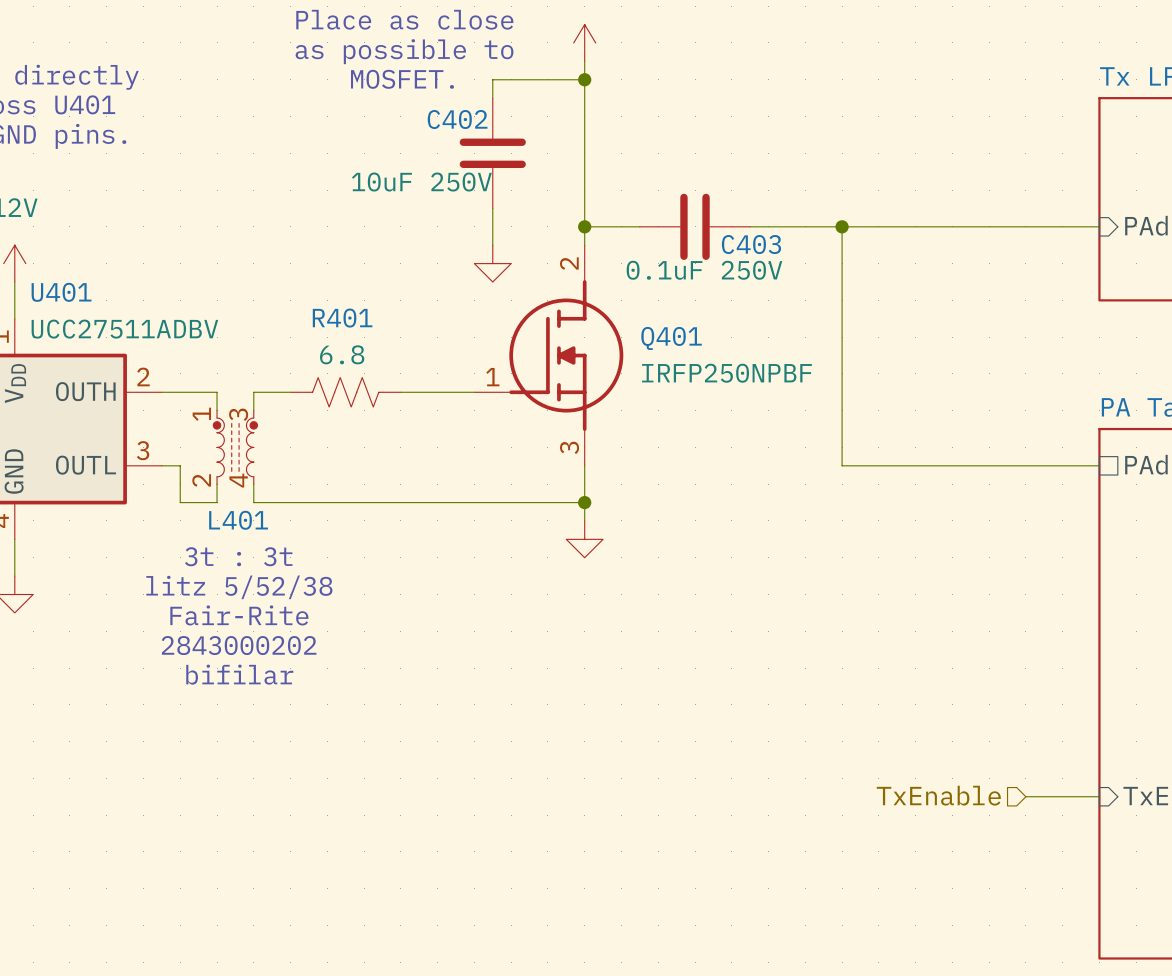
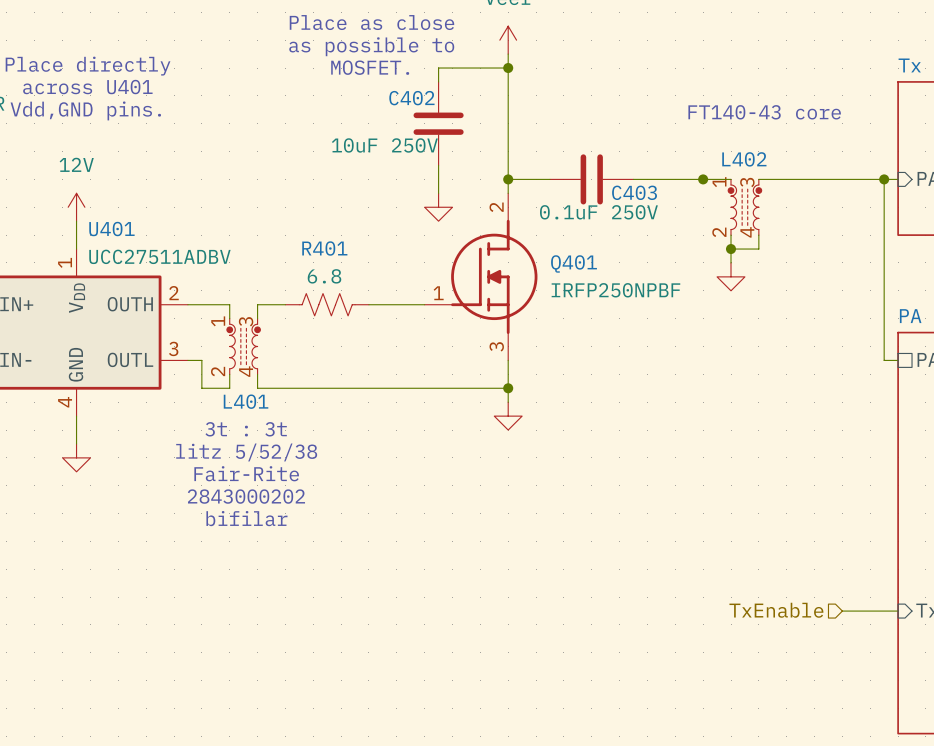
text: none -> FT140-43 core (764, 112)
wire: (842, 226) (842, 465) (1081, 465) -> (884, 179) (884, 360)
wire: (878, 226) (915, 226) -> none
junction: none -> (884, 179)
L402: none -> (744, 207)
wire: none -> (731, 235) (731, 262)
wire: none -> (758, 235) (758, 249) (731, 249)
junction: none -> (731, 249)
power symbol: none -> (731, 276)

